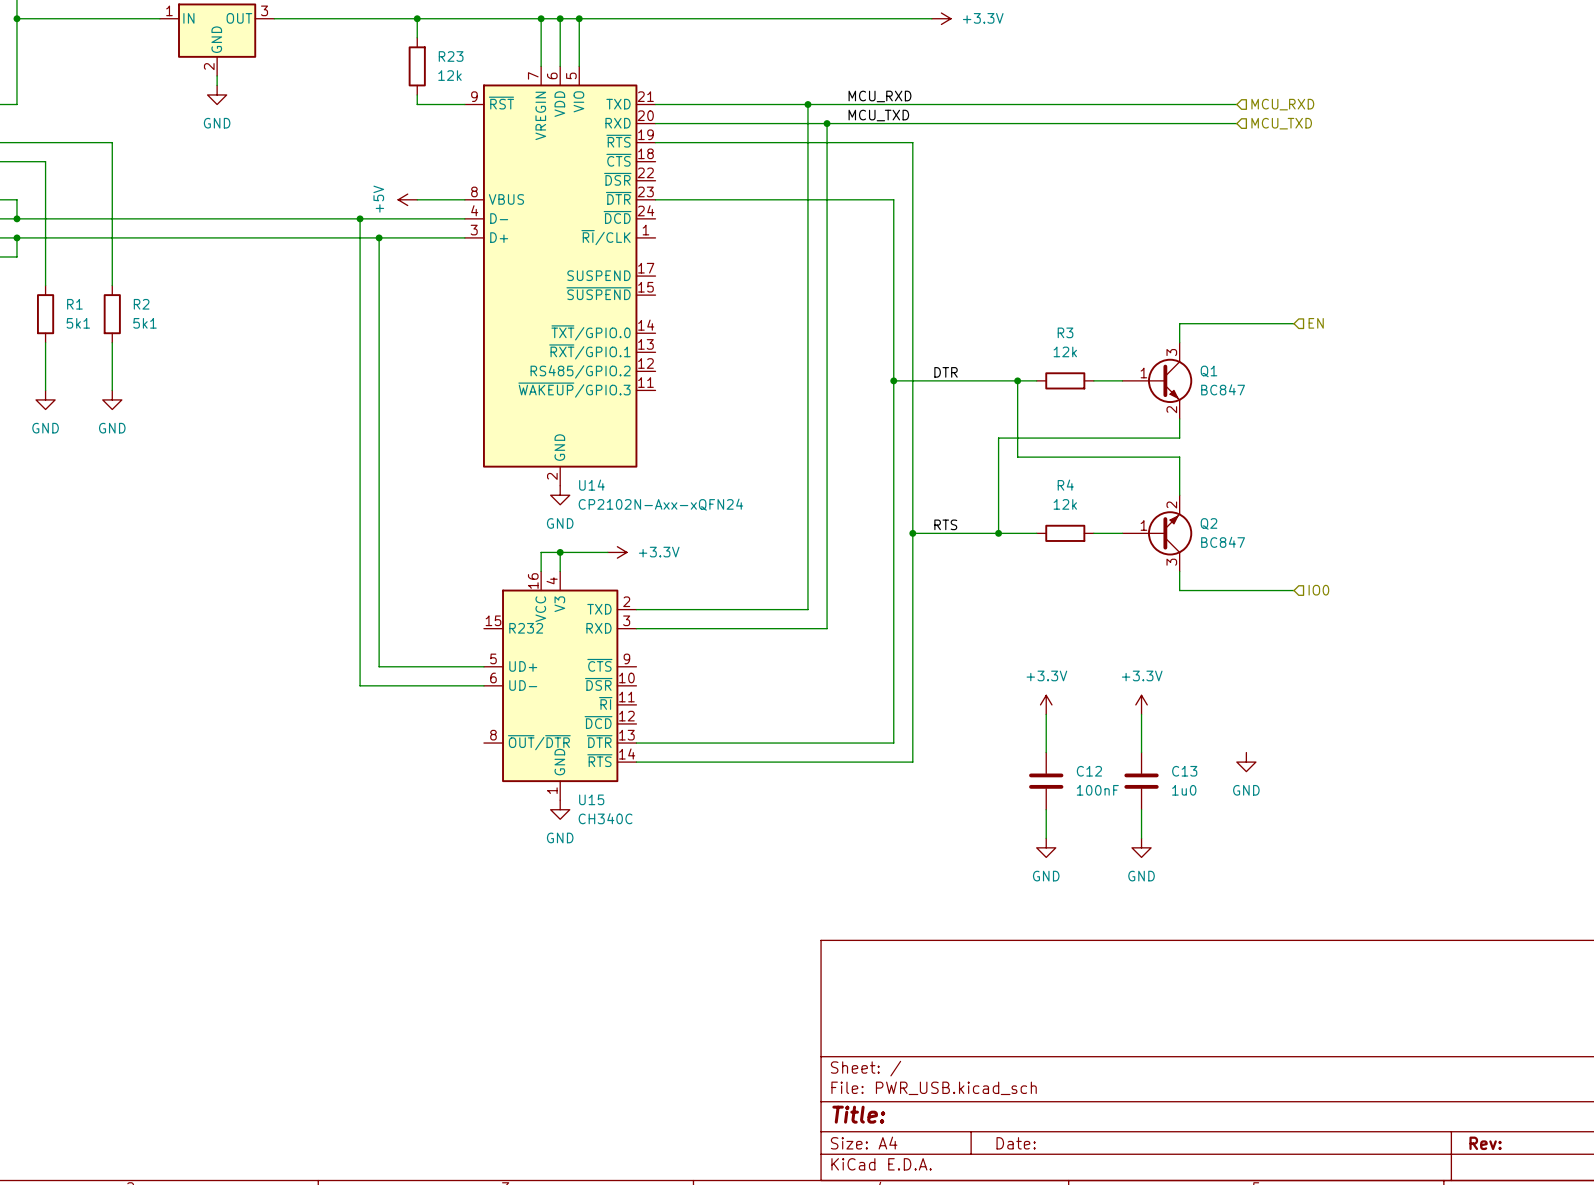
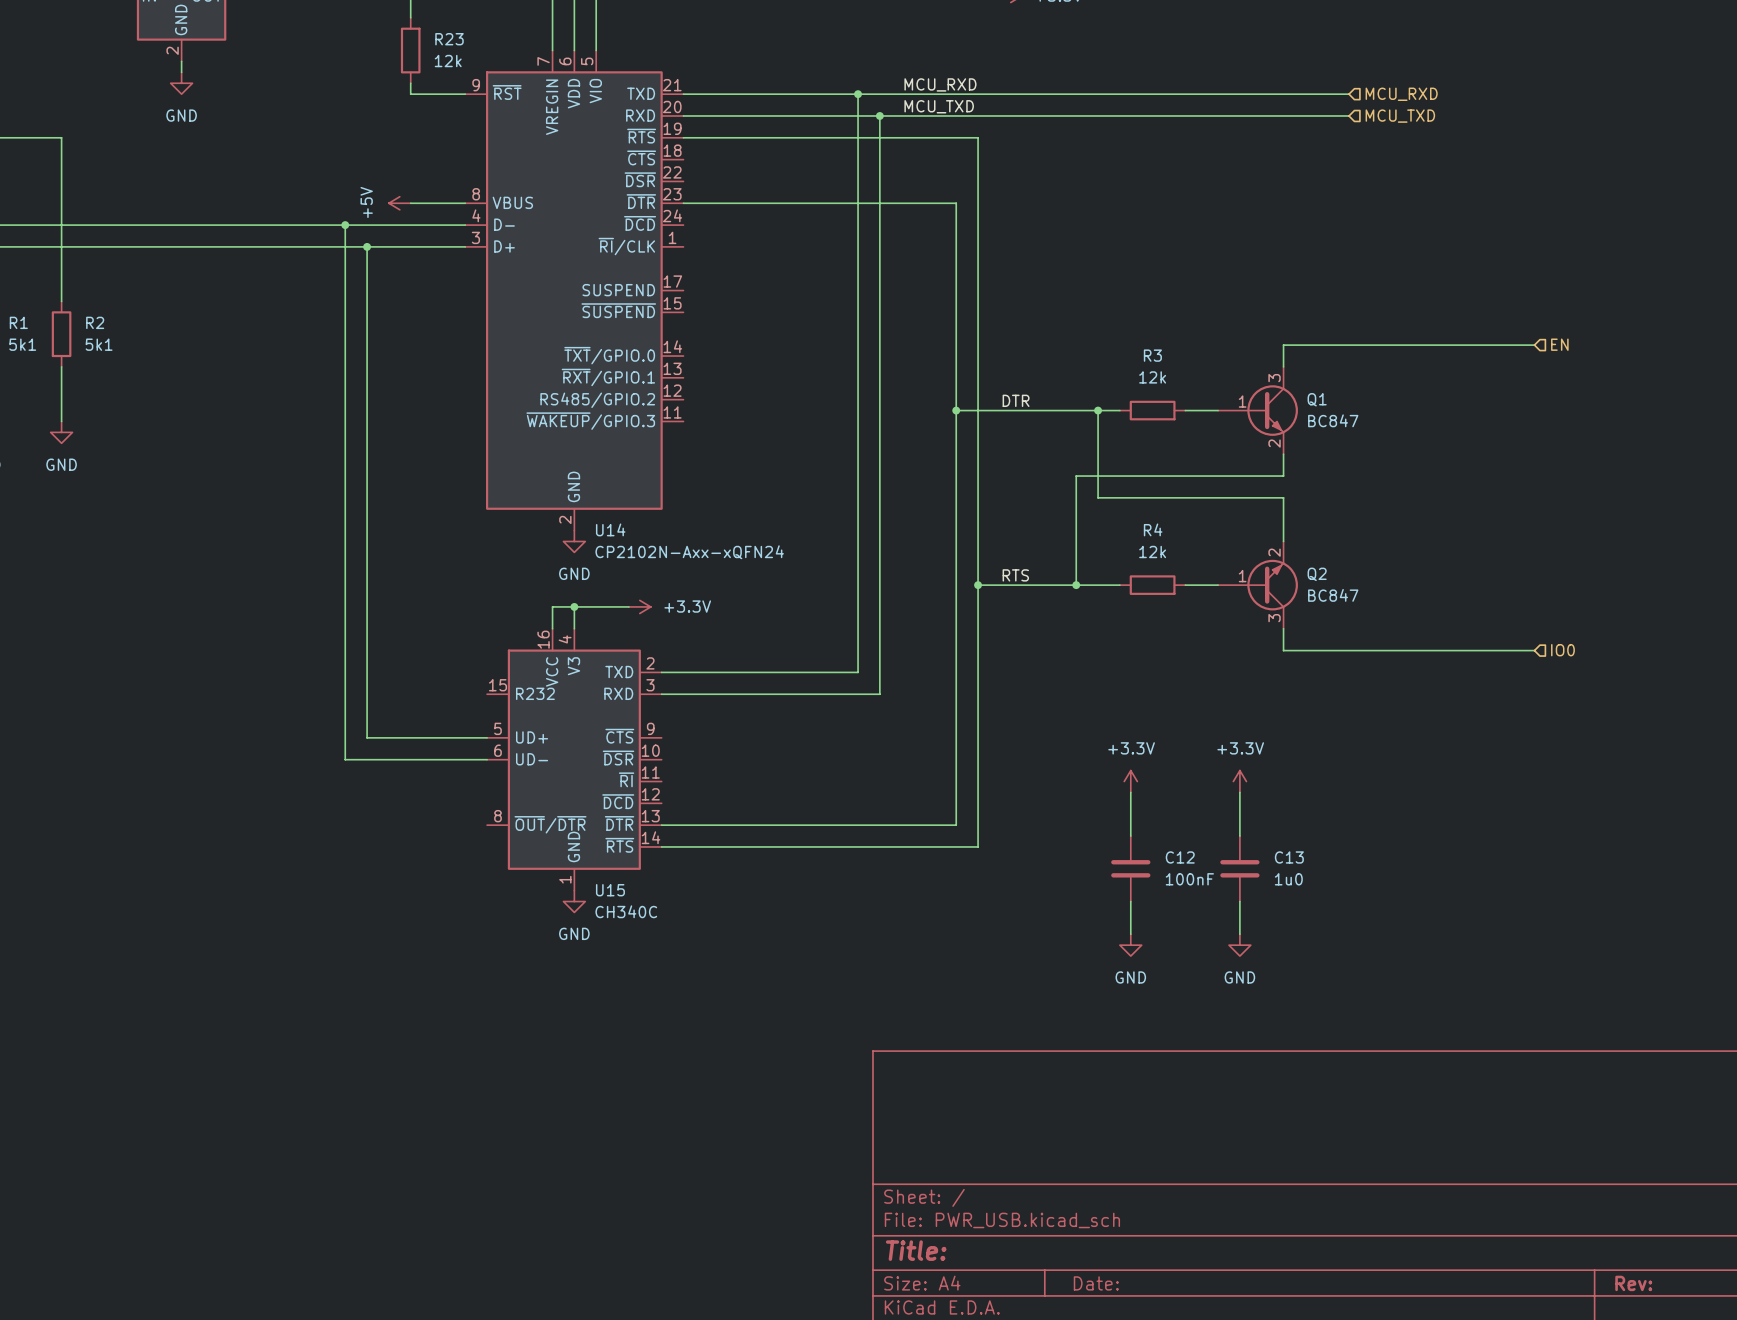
wire: none -> (1414, 345) (1534, 345)
hierarchical label position: EN (1316, 323) -> EN (1559, 344)
wire: none -> (1414, 650) (1534, 650)
hierarchical label position: IO0 (1318, 590) -> IO0 (1562, 650)
power symbol: GND (1246, 762) -> none

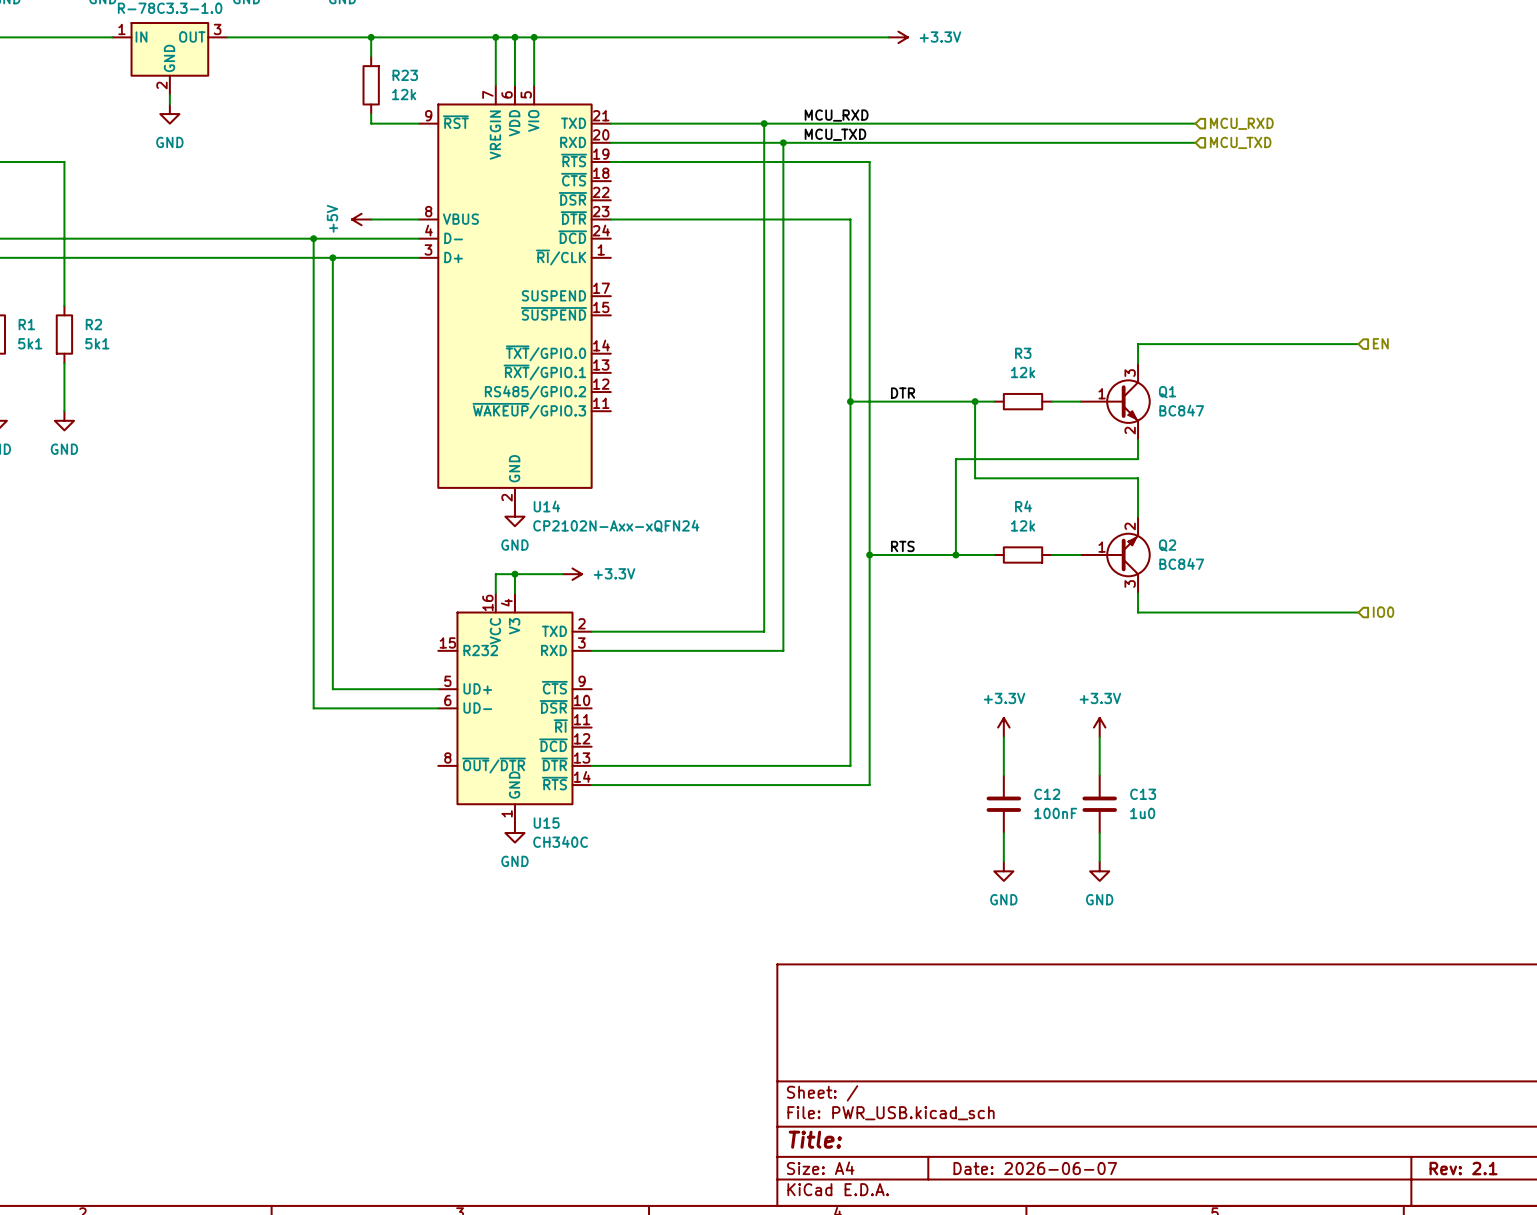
title block: Date: (1096, 1283) -> Date: 2026-06-07 (1035, 1168)
title block: Rev: (1633, 1283) -> Rev: 2.1 (1463, 1168)

